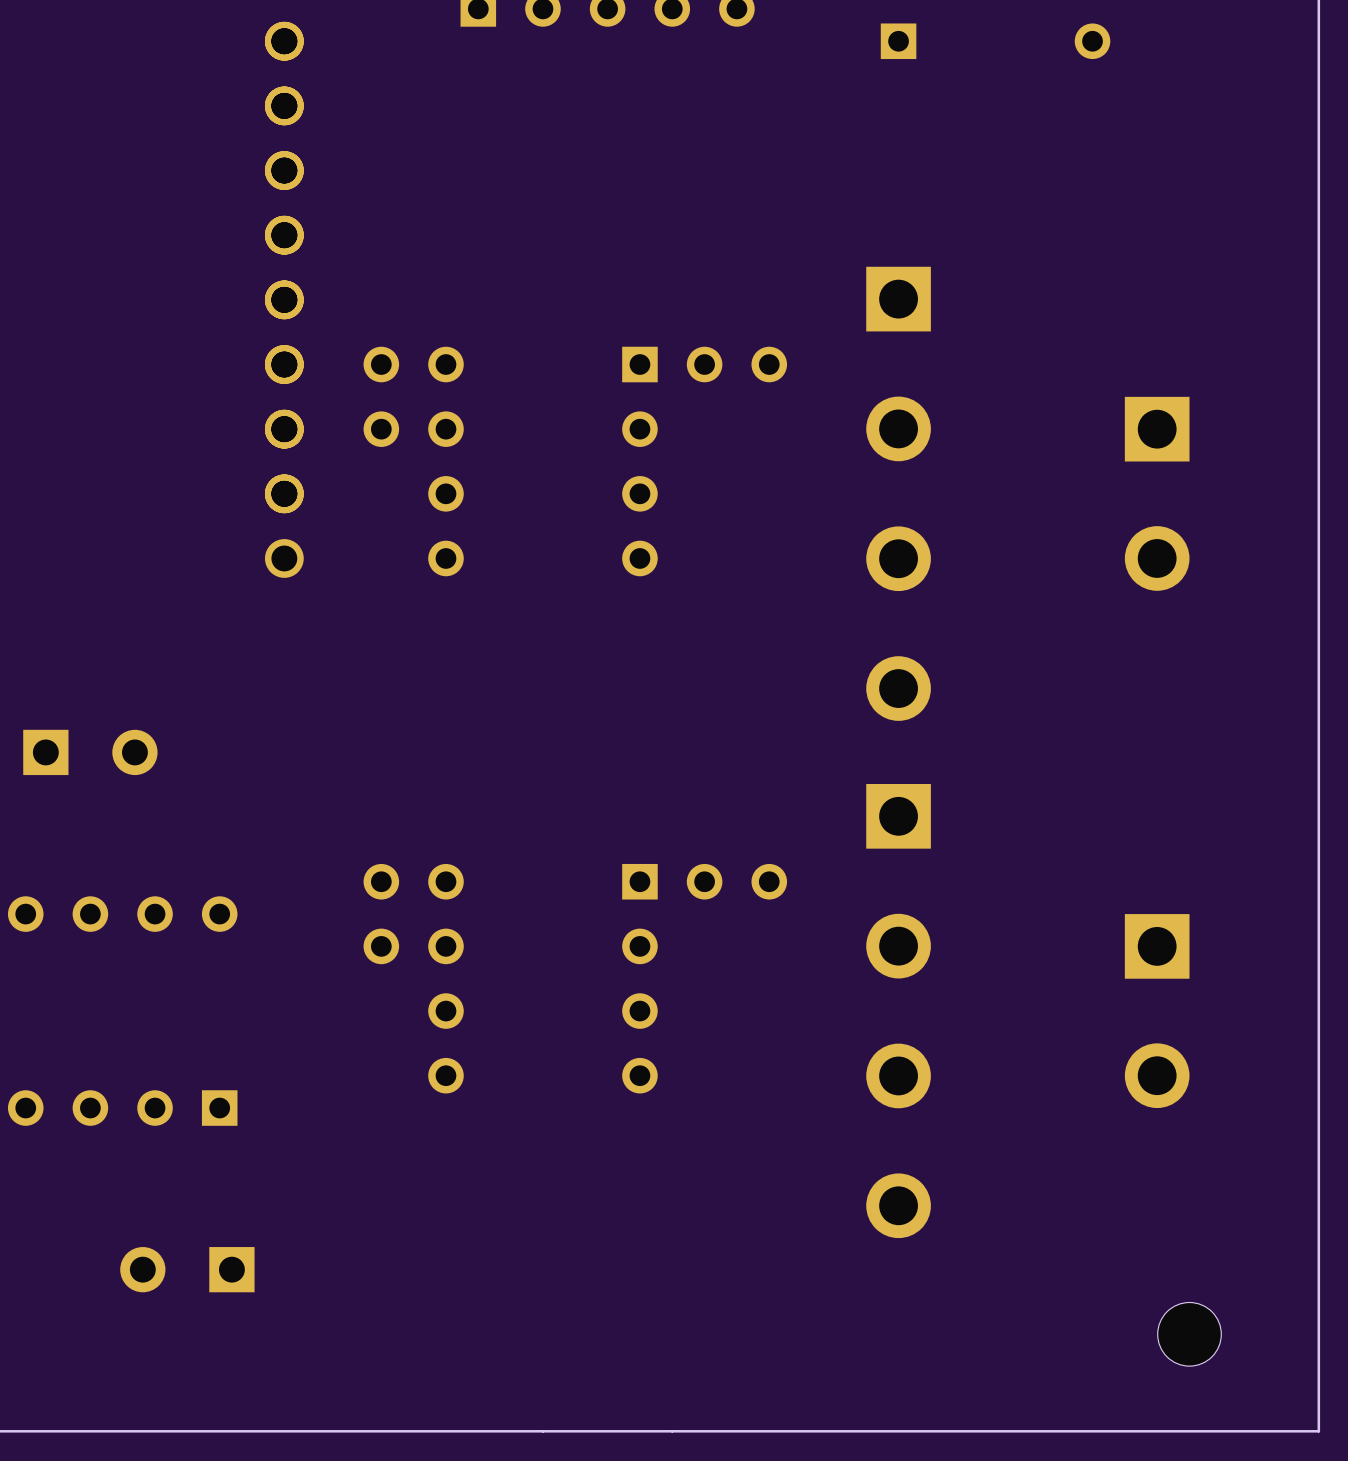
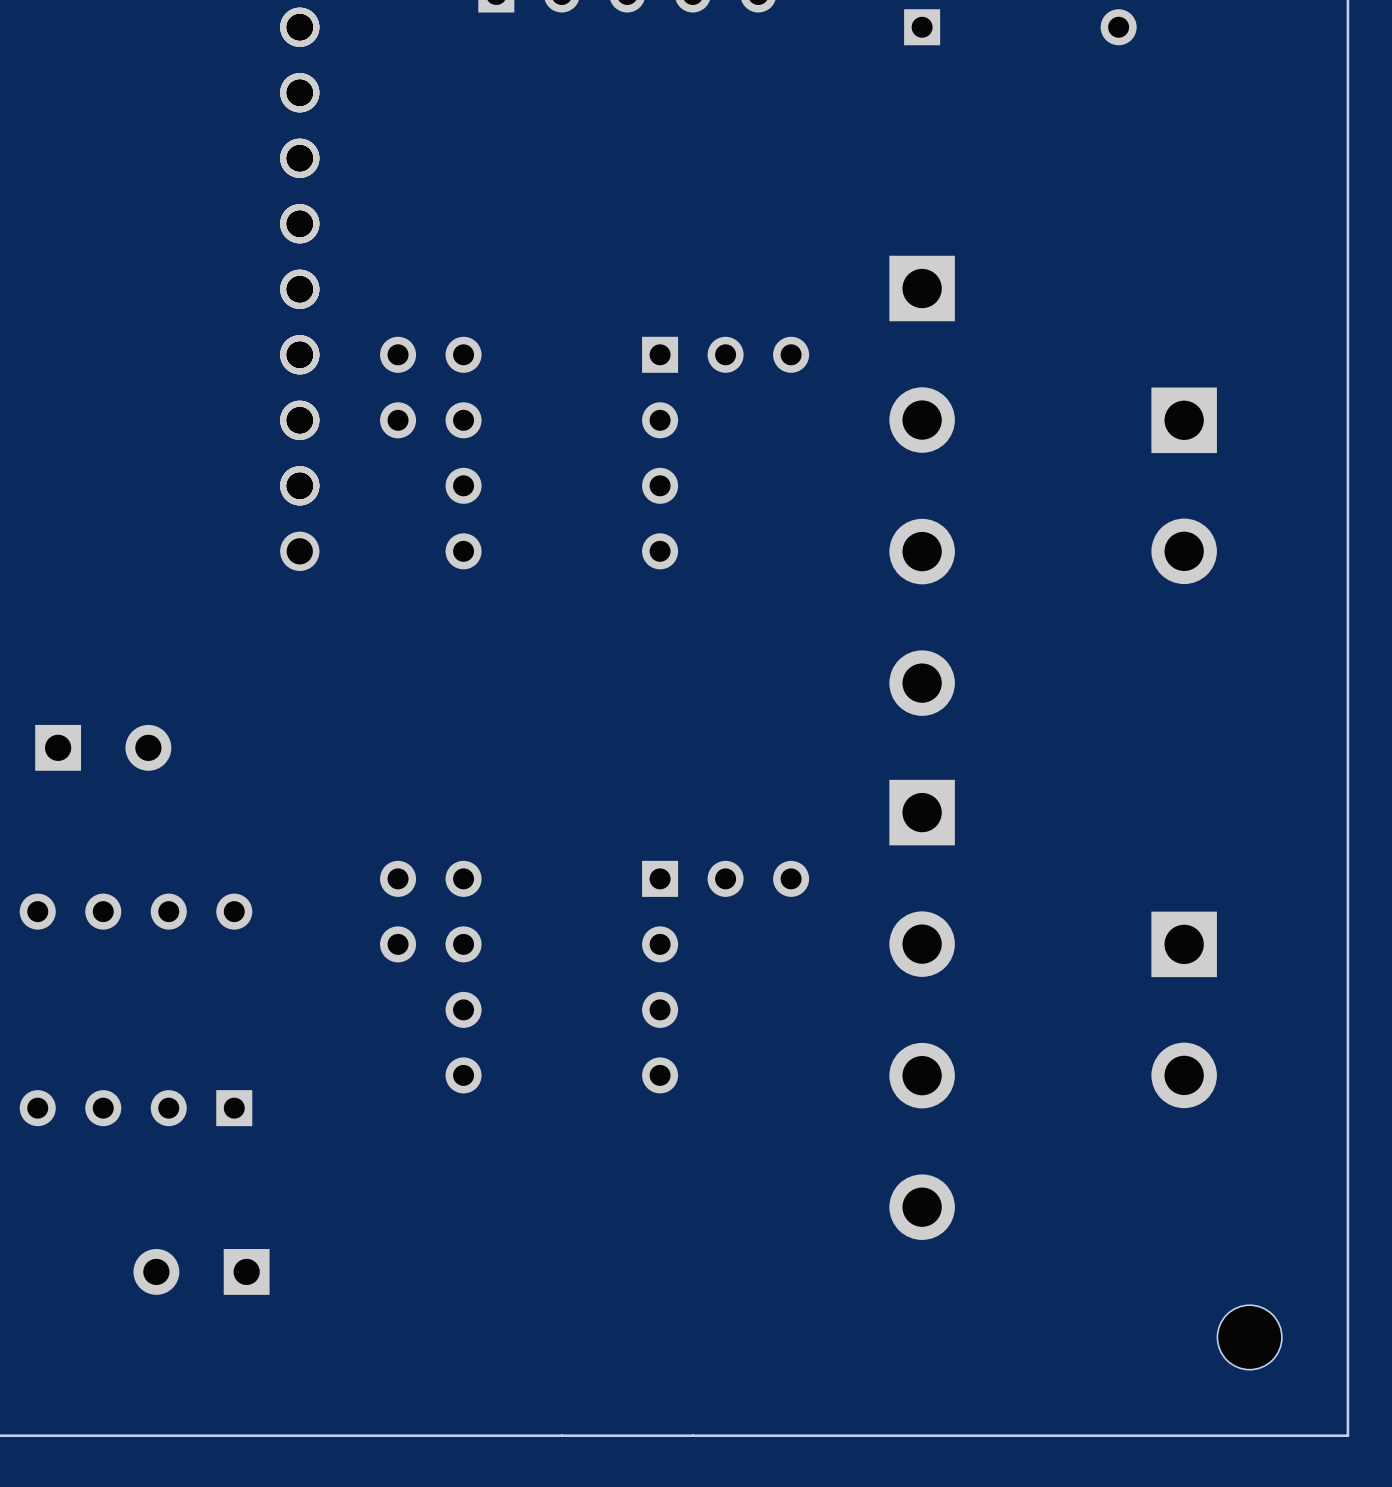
part position: (1189, 1334) -> (1249, 1337)

